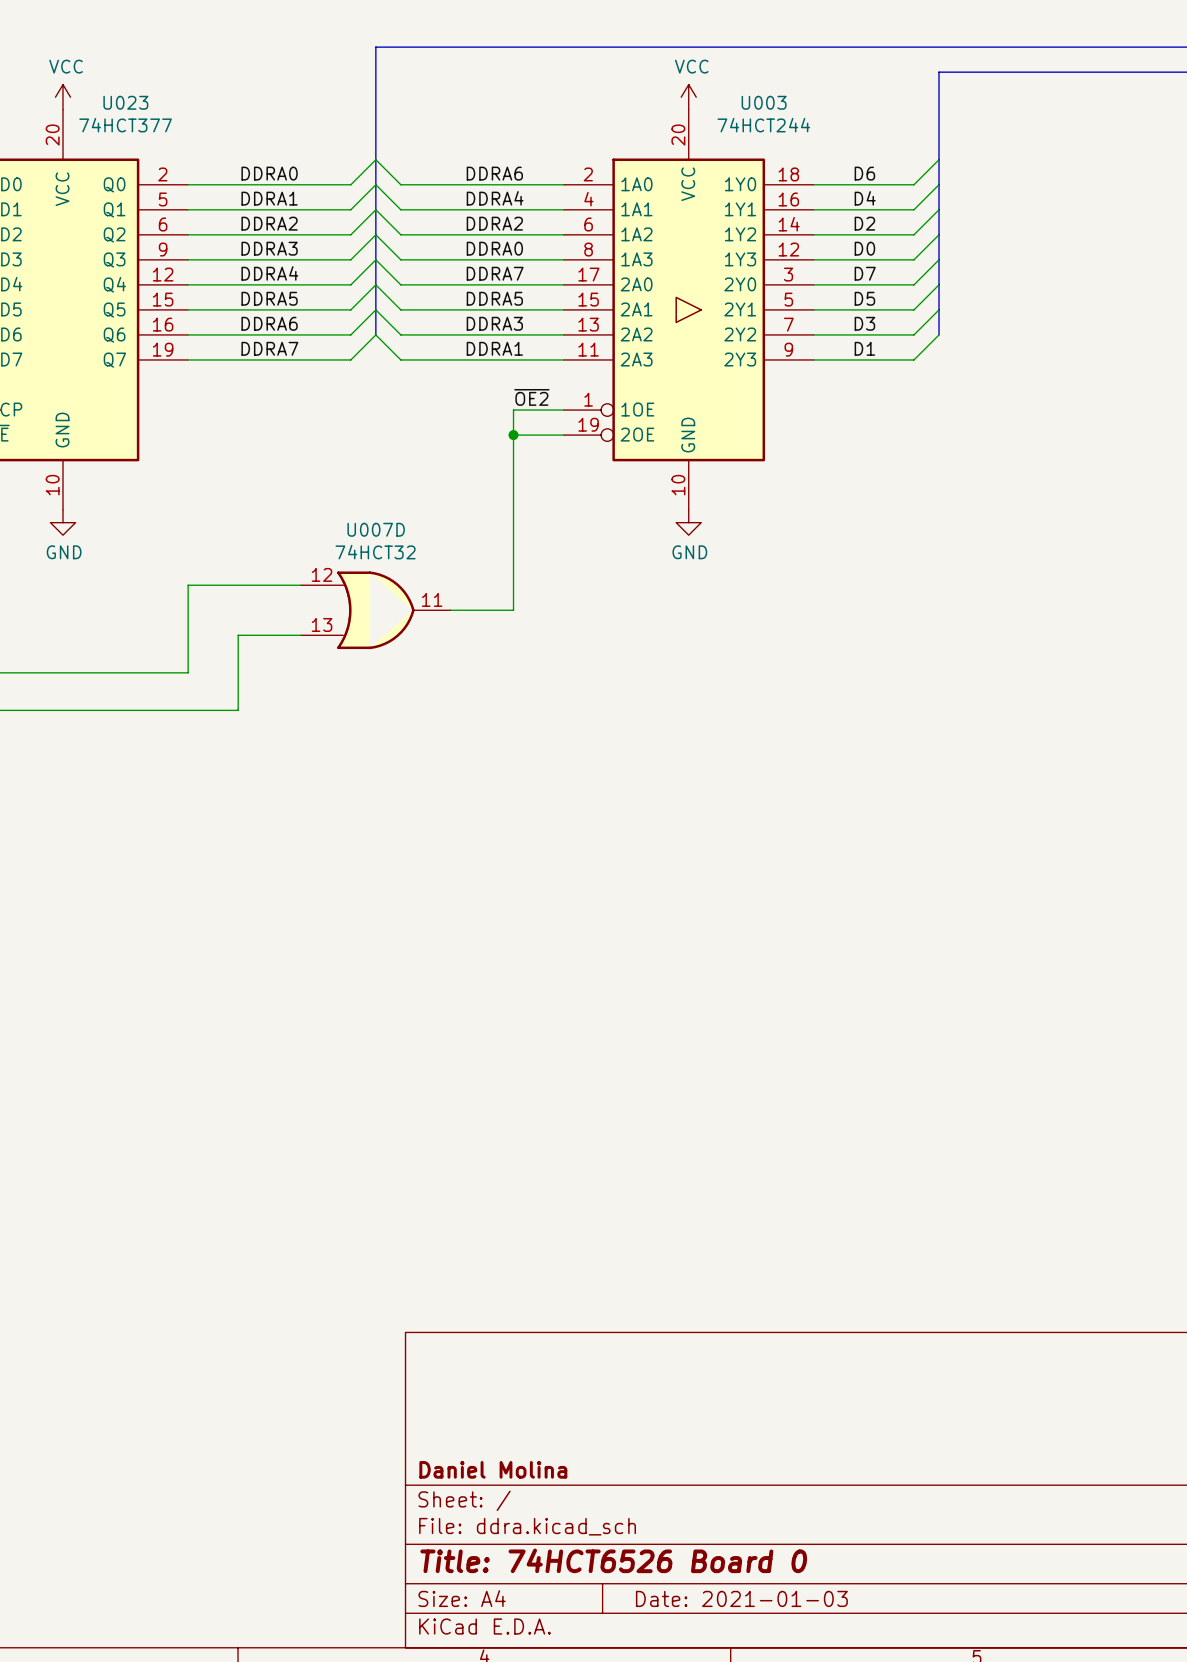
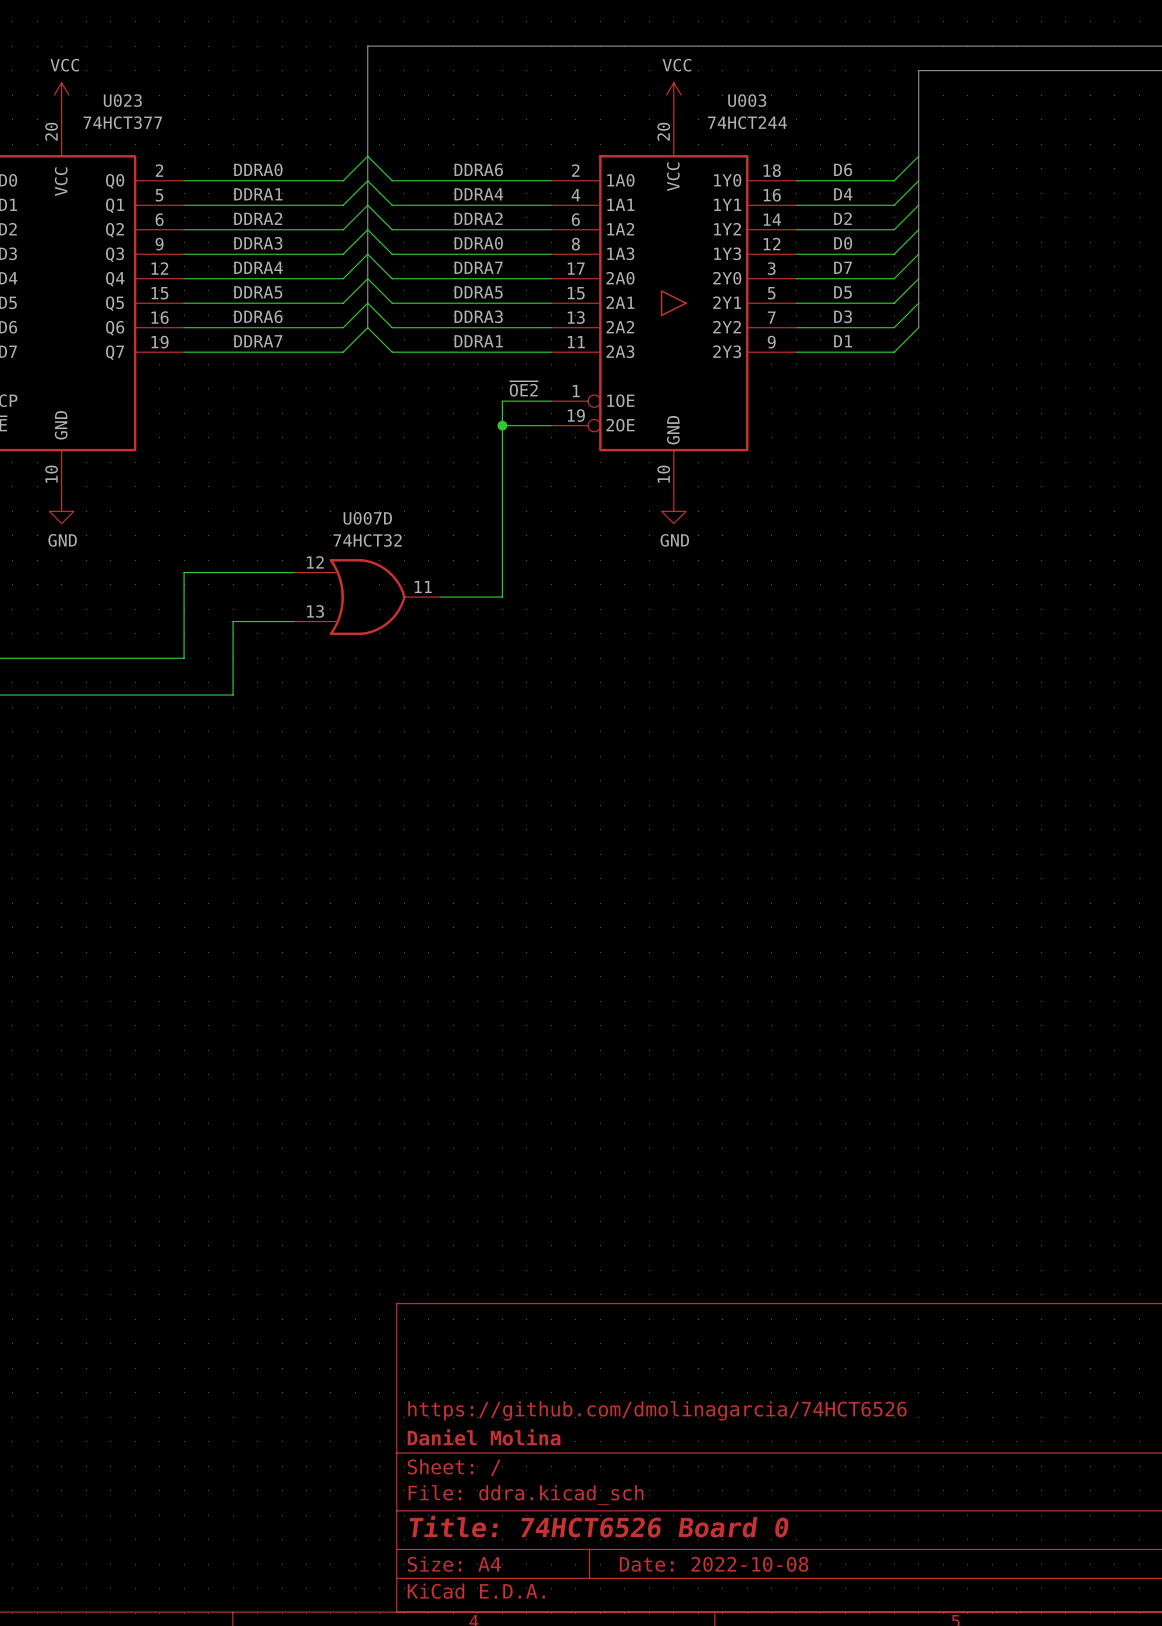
title block: none -> https://github.com/dmolinagarcia/74HCT6526 (657, 1410)
title block: Date: 2021-01-03 (741, 1598) -> Date: 2022-10-08 (714, 1564)

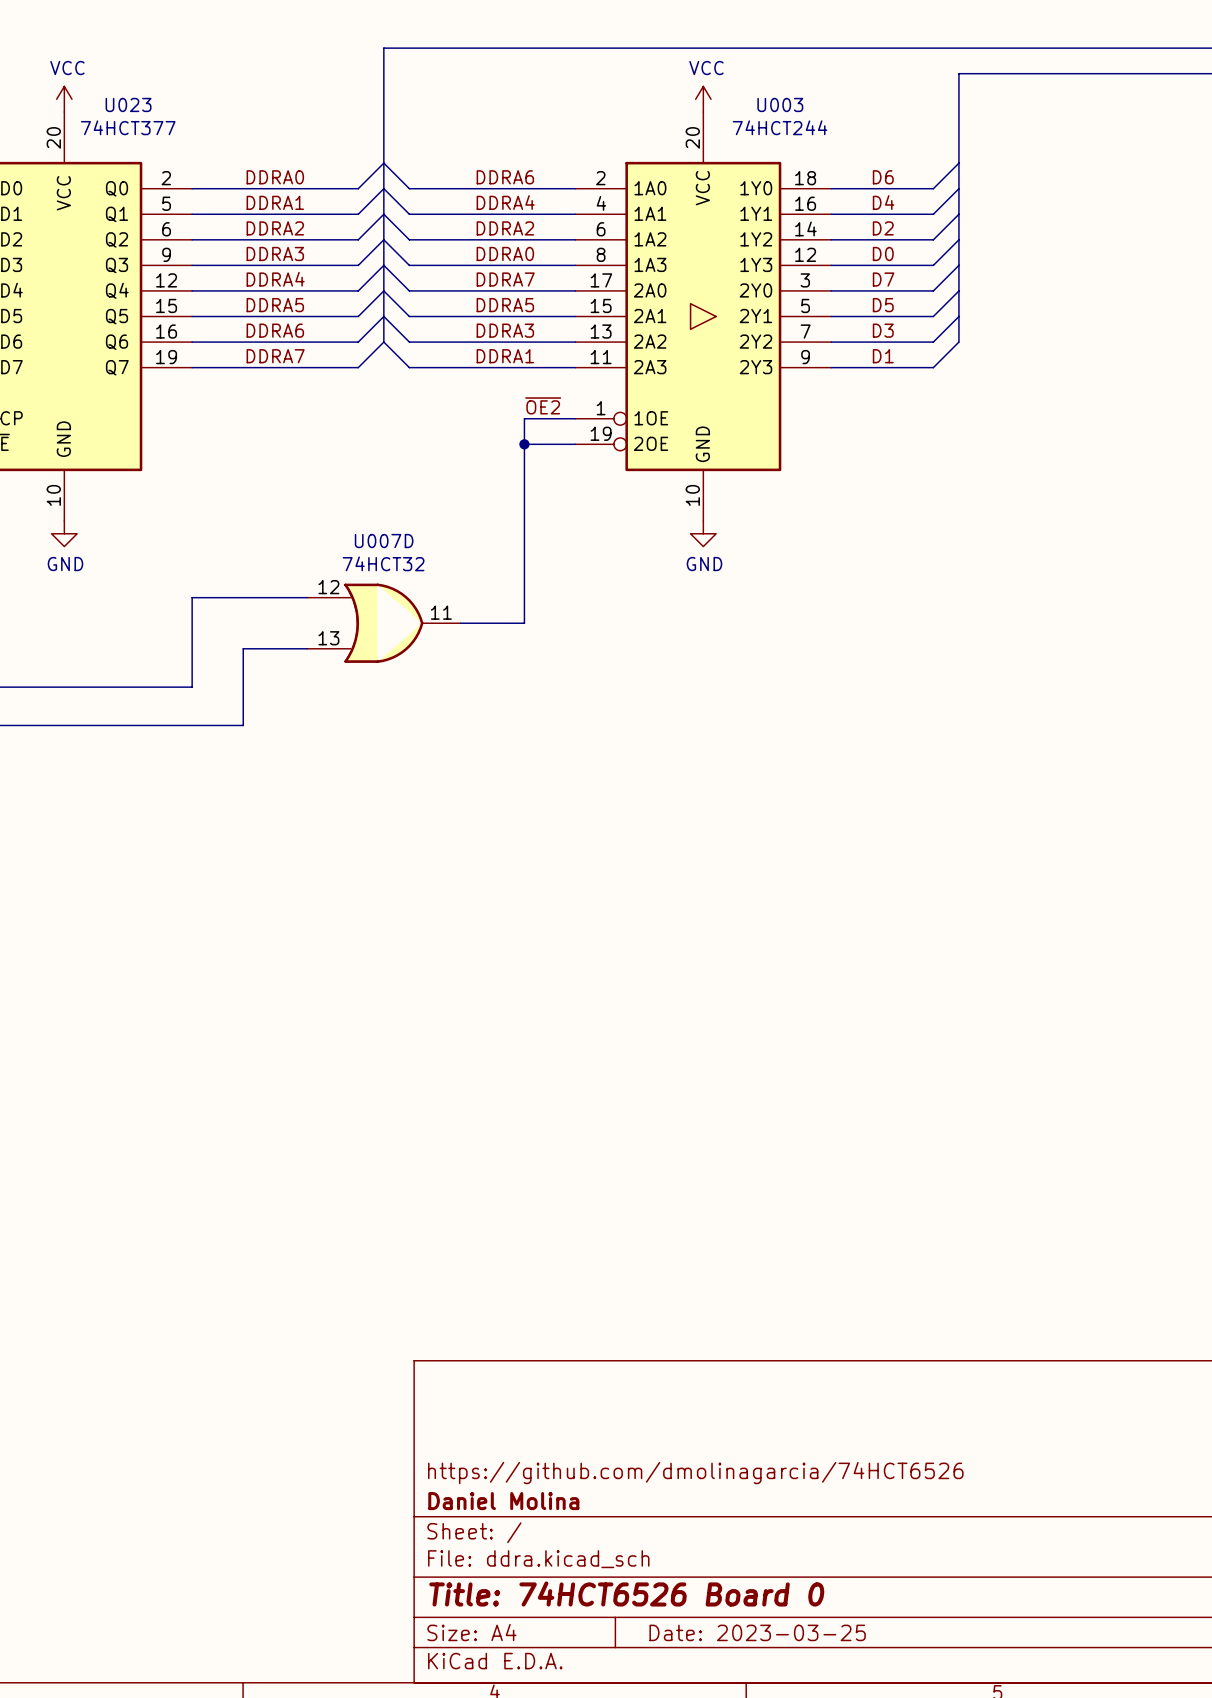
title block: Date: 2022-10-08 (714, 1564) -> Date: 2023-03-25 (757, 1632)

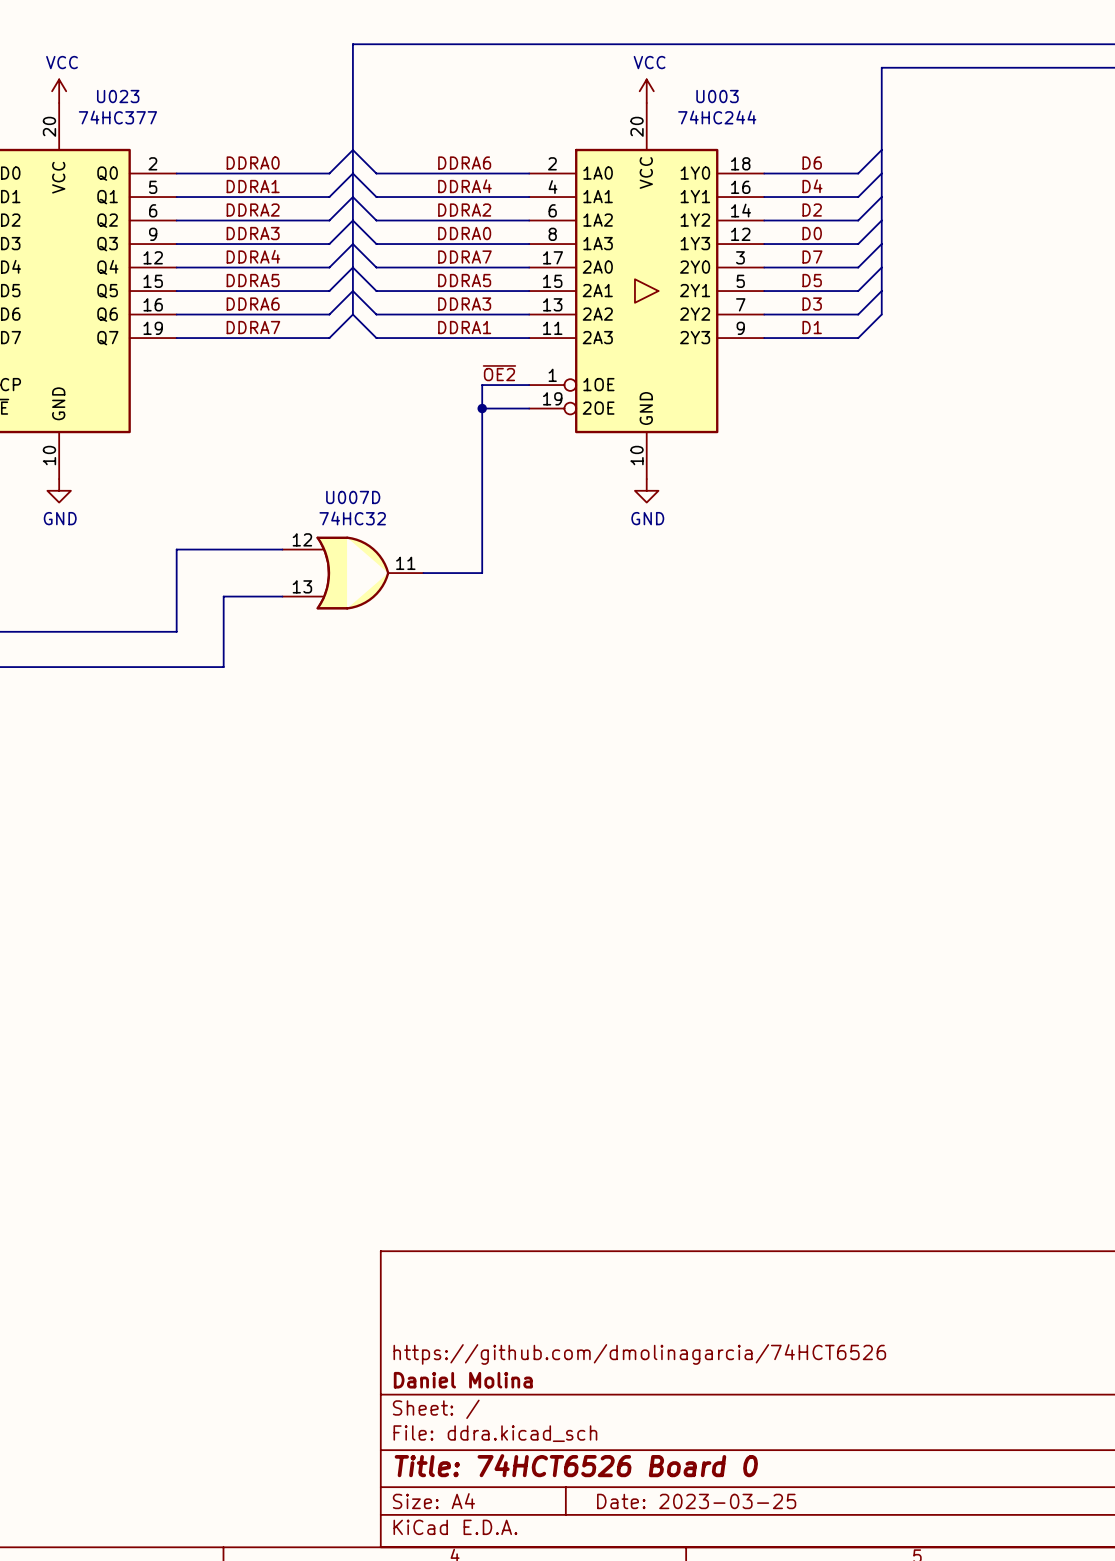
U023 value: 74HCT377 (128, 127) -> 74HC377 (117, 117)
U003 value: 74HCT244 (780, 127) -> 74HC244 (717, 117)
U007D value: 74HCT32 (383, 563) -> 74HC32 (352, 518)

